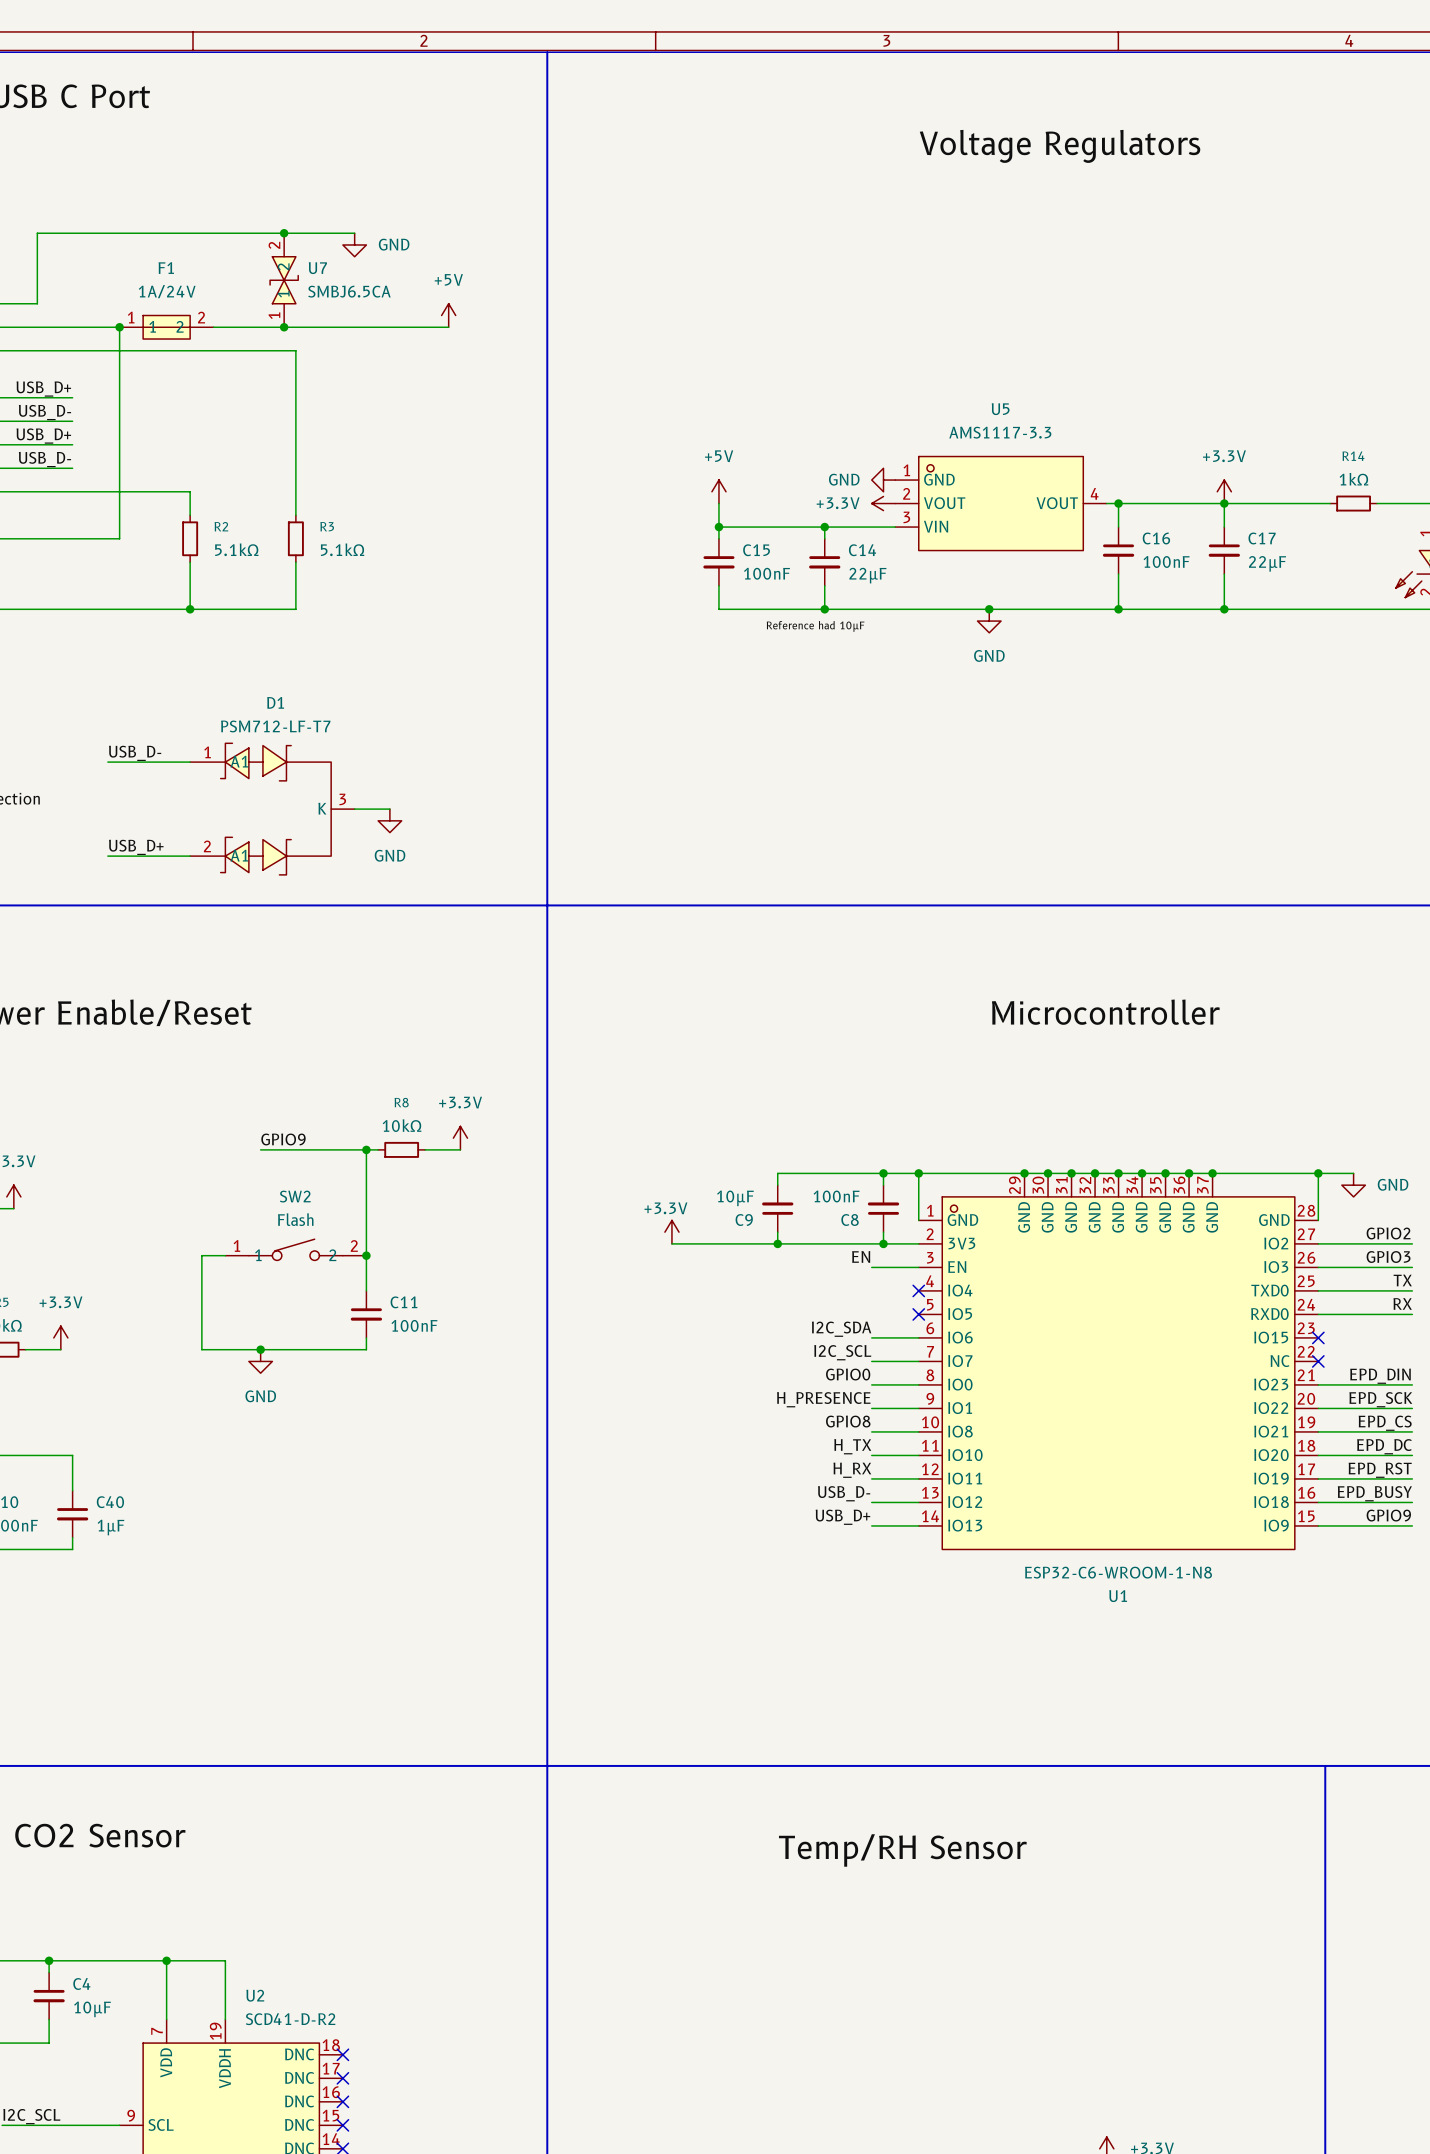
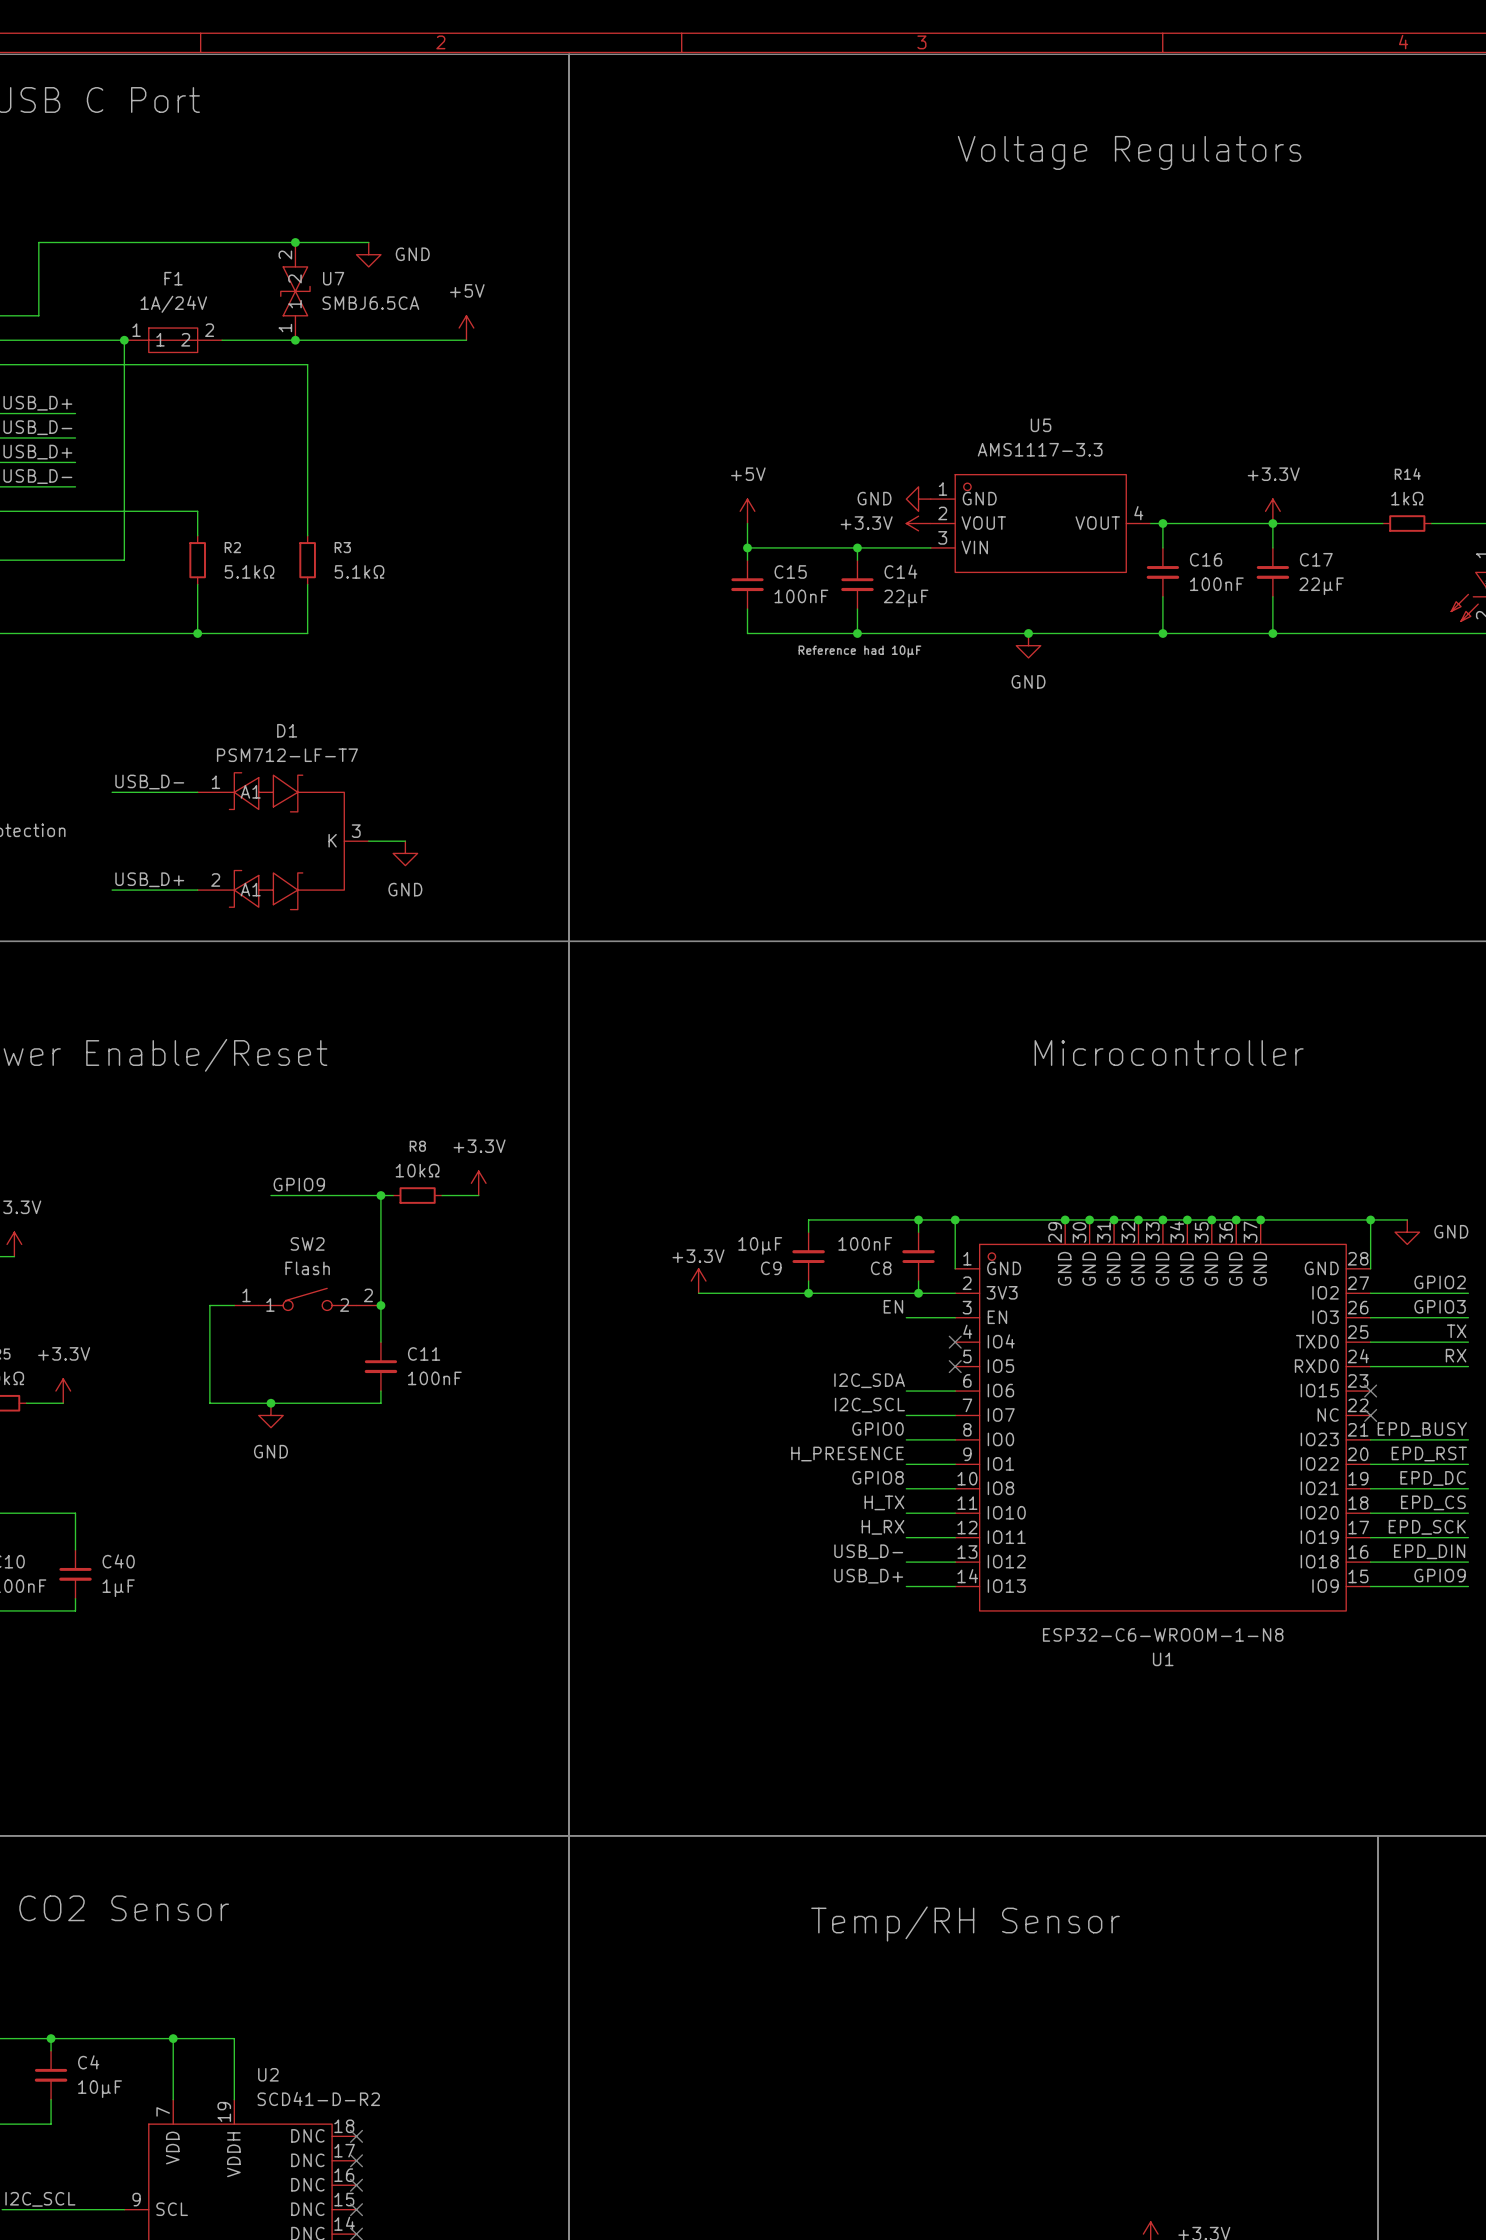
label: EPD_DIN (1380, 1376) -> EPD_BUSY (1422, 1429)
label: EPD_SCK (1380, 1399) -> EPD_RST (1429, 1454)
label: EPD_CS (1385, 1423) -> EPD_DC (1433, 1478)
label: EPD_DC (1384, 1446) -> EPD_CS (1433, 1502)
label: EPD_RST (1380, 1470) -> EPD_SCK (1427, 1527)
label: EPD_BUSY (1374, 1493) -> EPD_DIN (1429, 1551)

